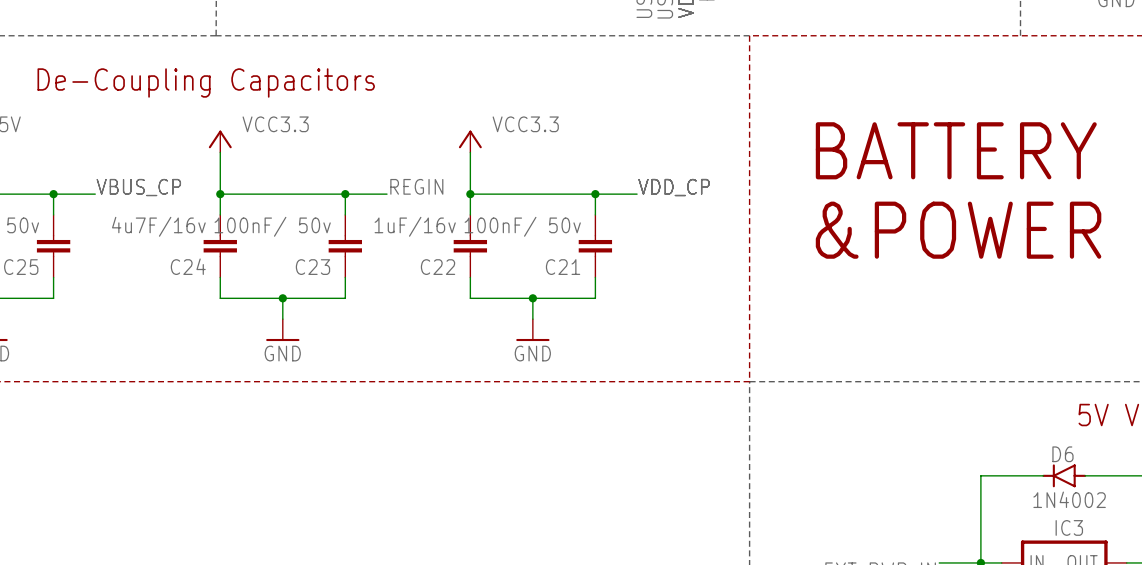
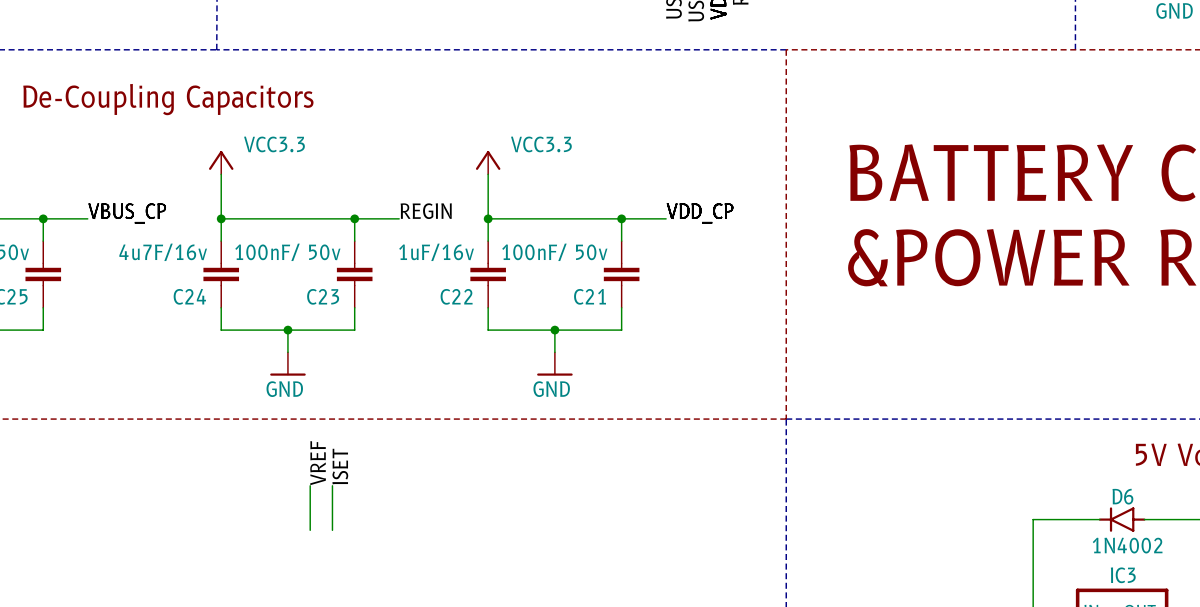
label: none -> VREF (318, 463)
label: none -> ISET (340, 466)
wire: none -> (310, 485) (310, 530)
wire: none -> (332, 485) (332, 530)

